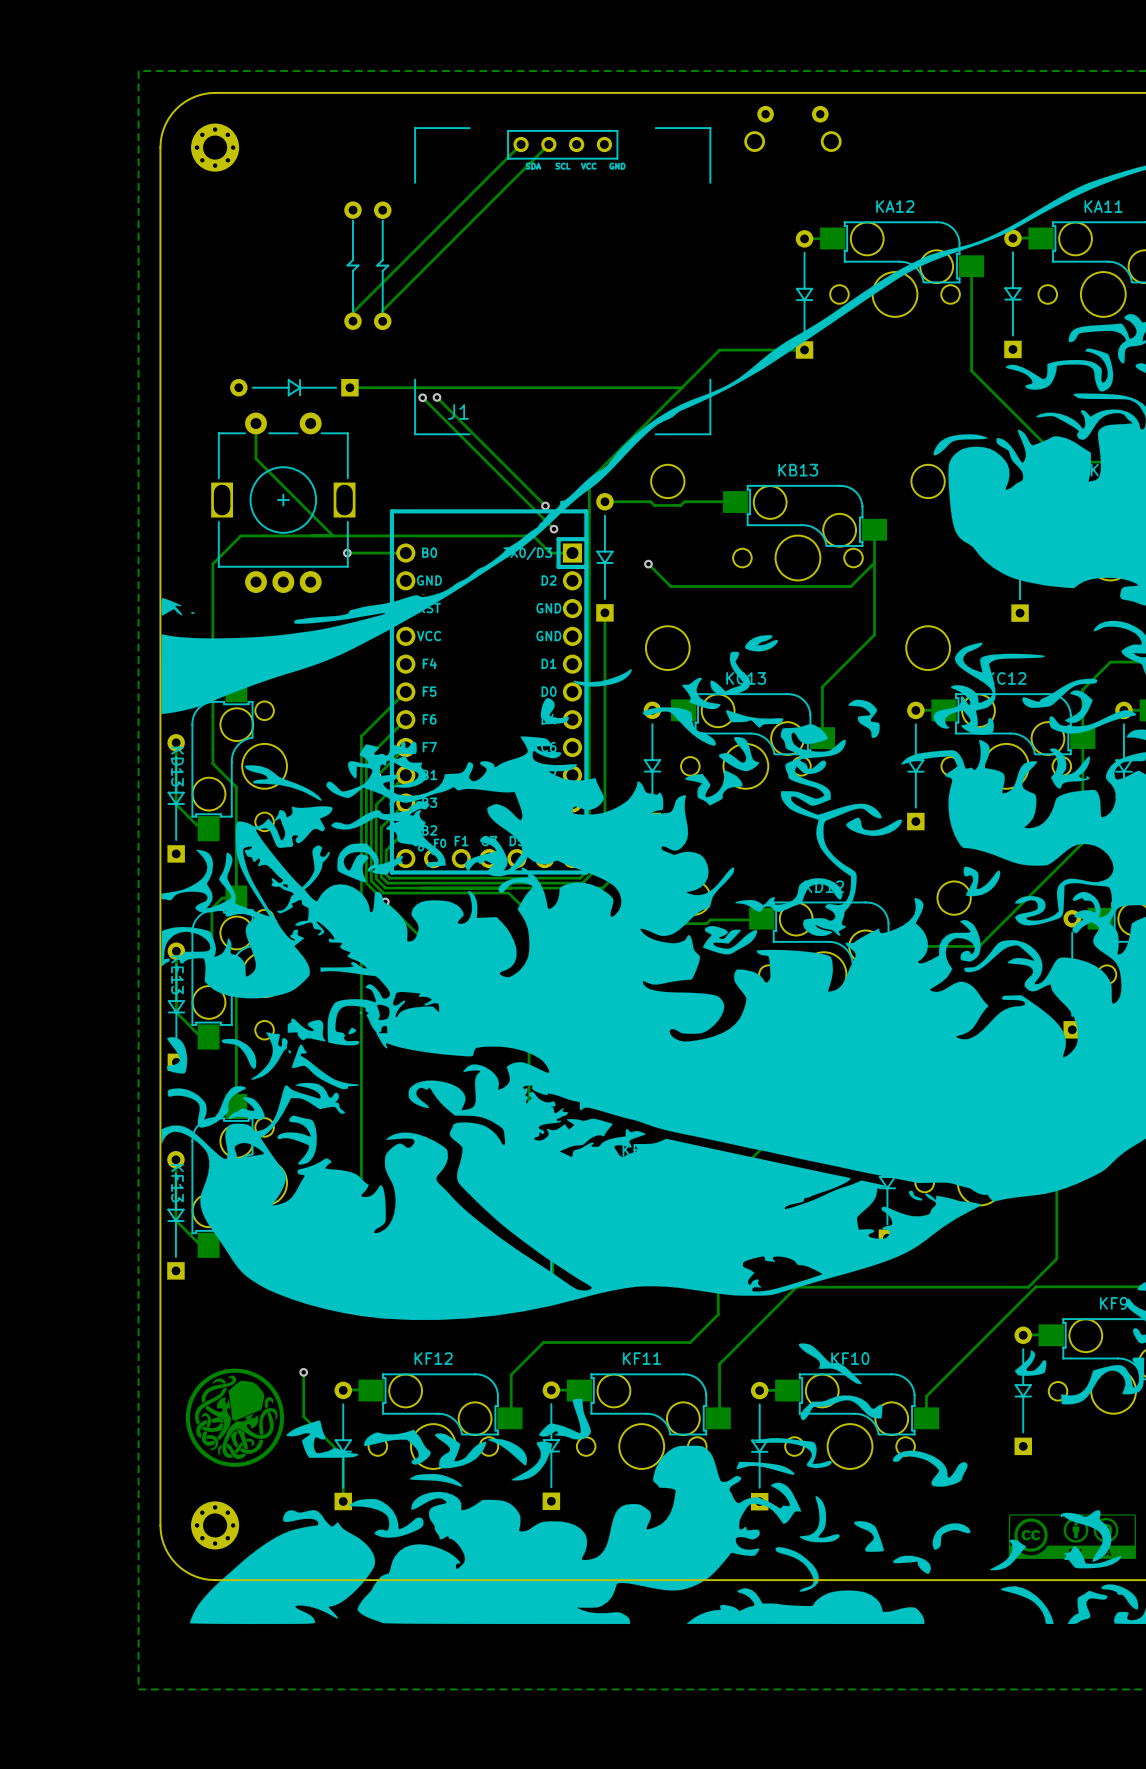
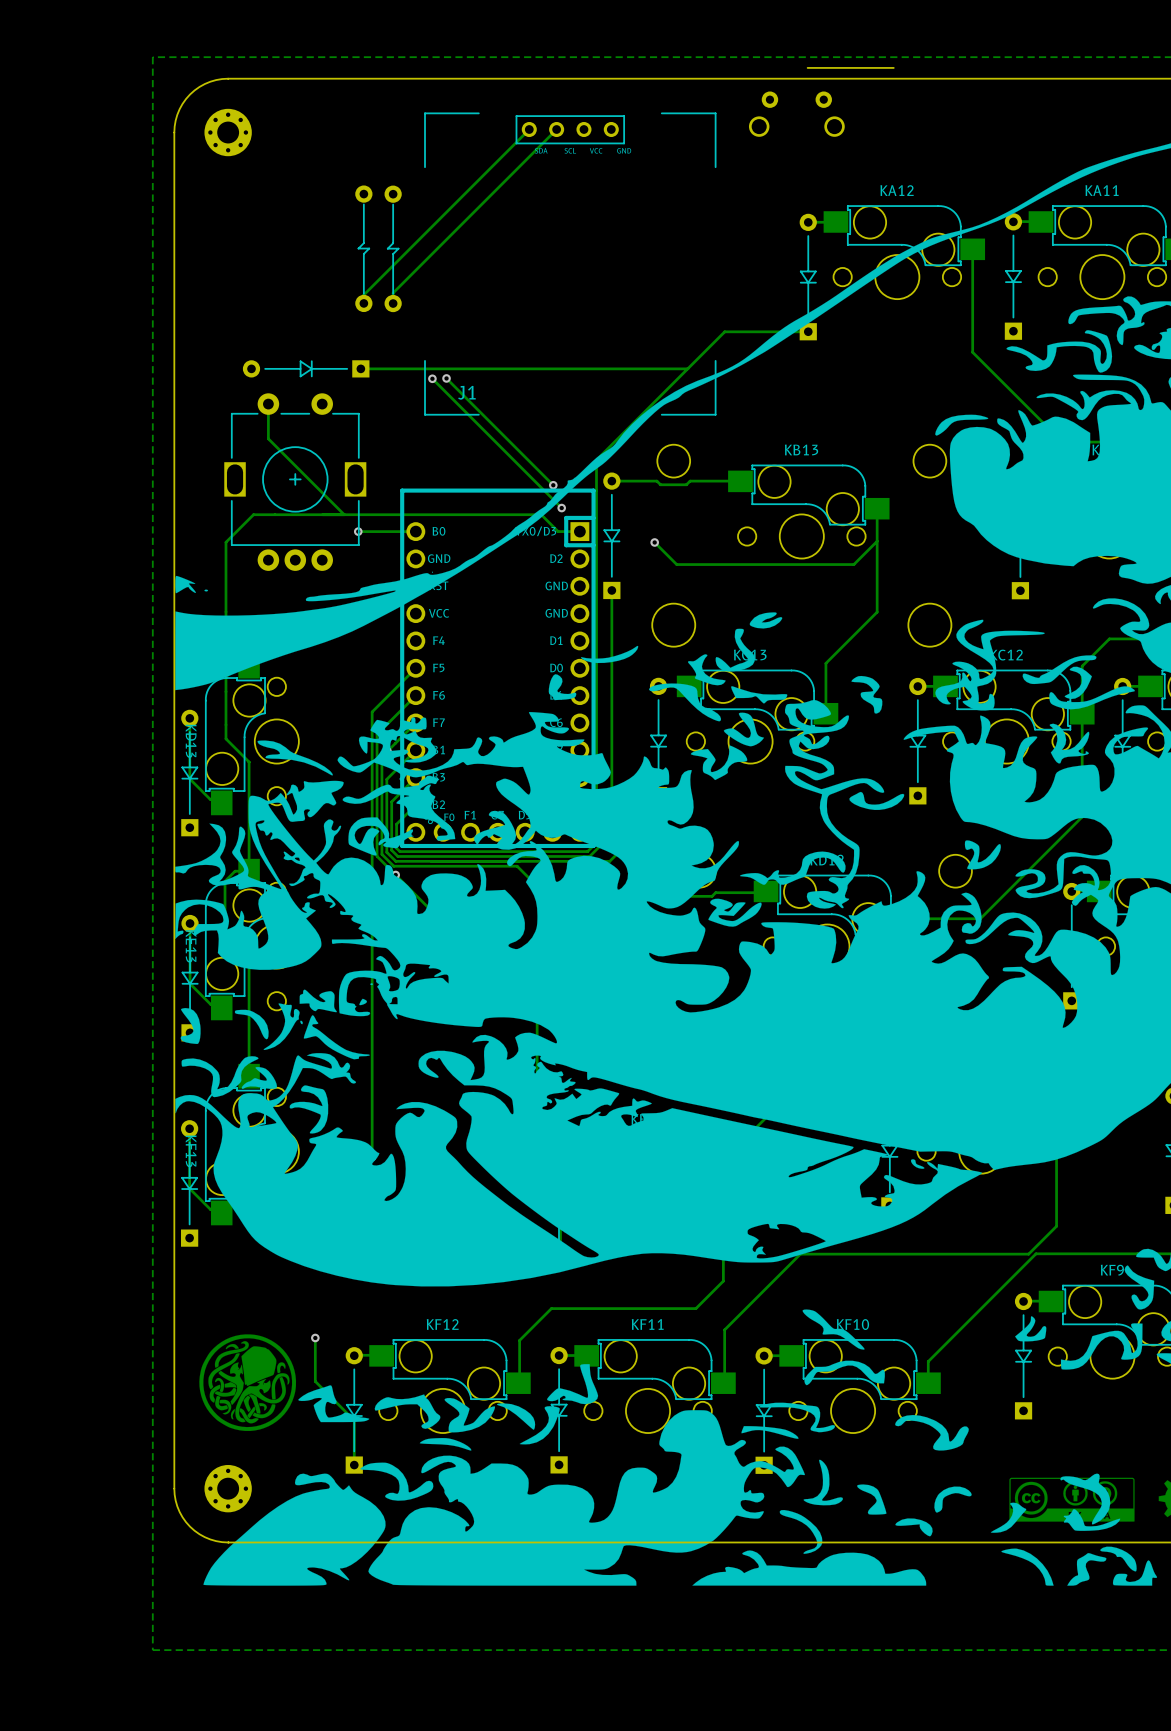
board edge: none -> (893, 67) (807, 67)
round board edge: none -> [216, 120, 241, 145]
round board edge: none -> [216, 1476, 241, 1501]

